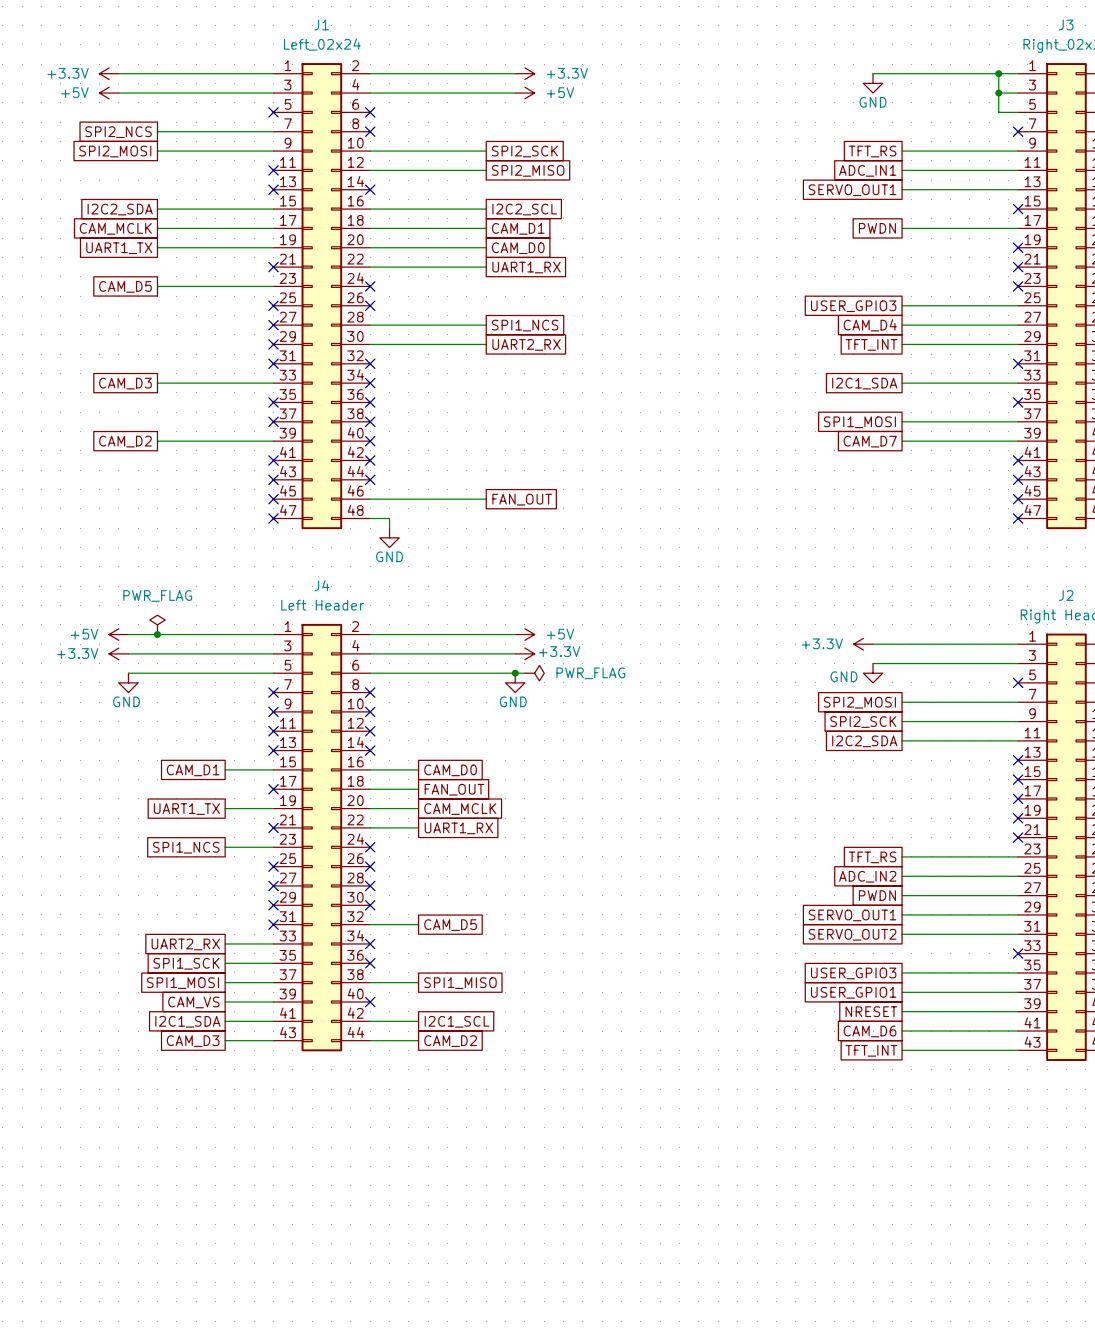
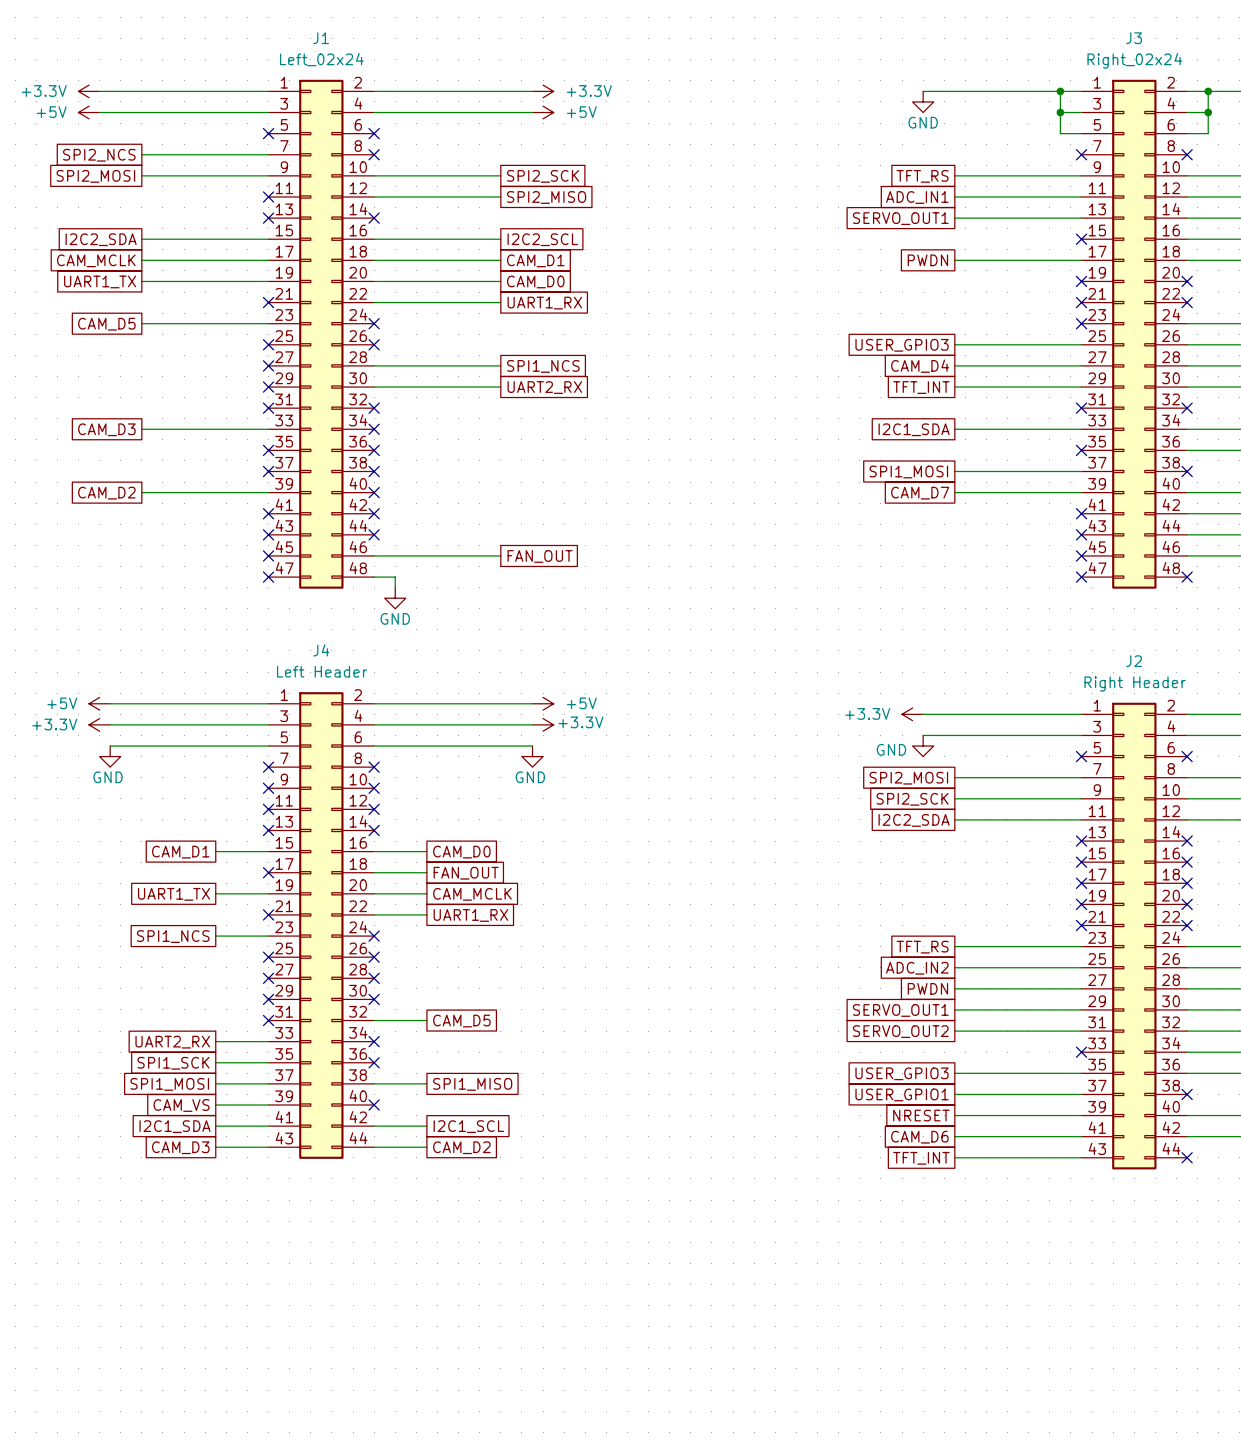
power symbol: PWR_FLAG (157, 624) -> none
junction: (157, 634) -> none
wire: (515, 673) (524, 673) -> none
junction: (515, 673) -> none
power symbol: PWR_FLAG (534, 673) -> none

